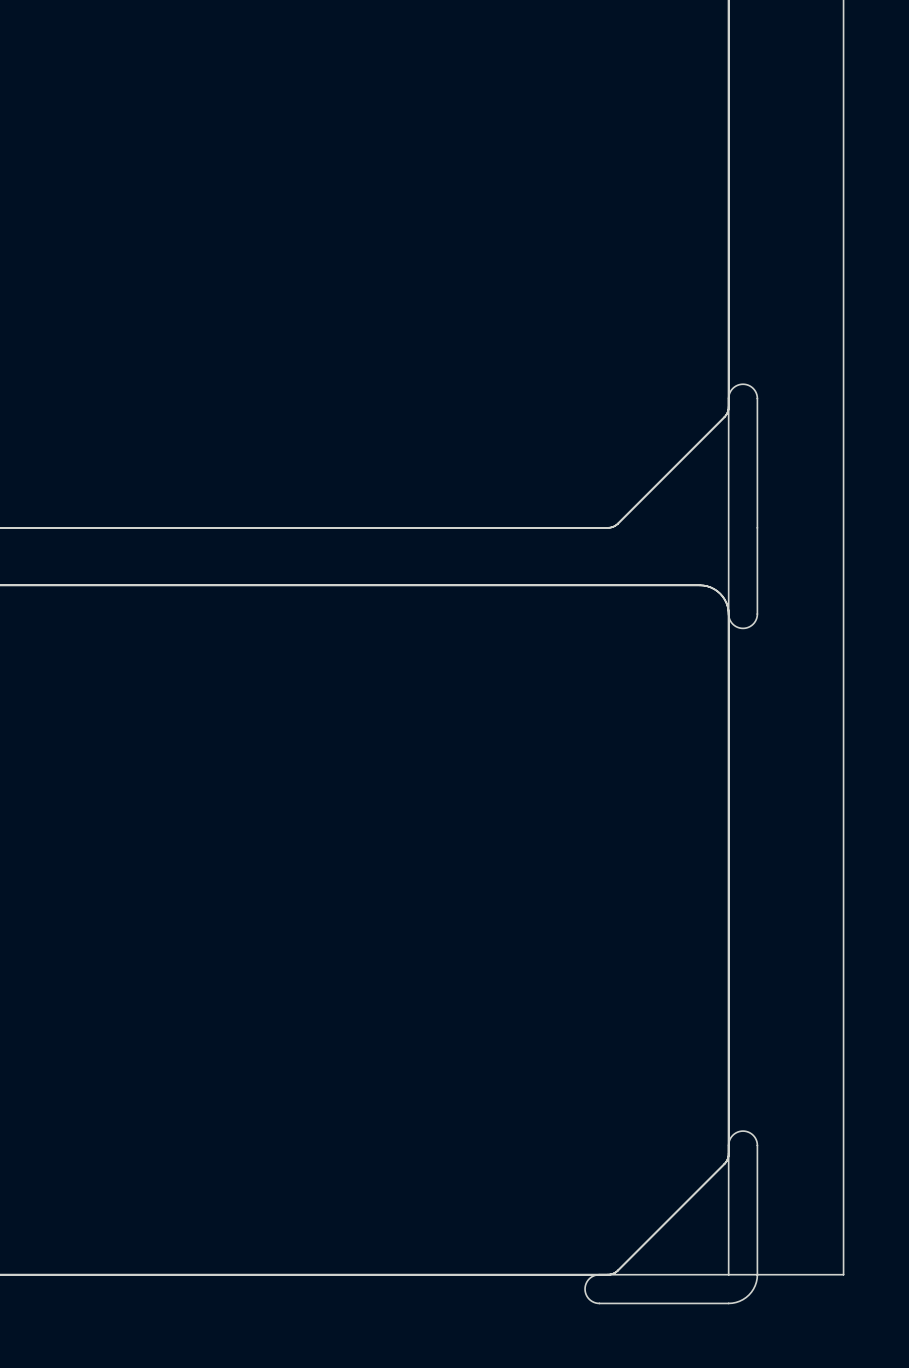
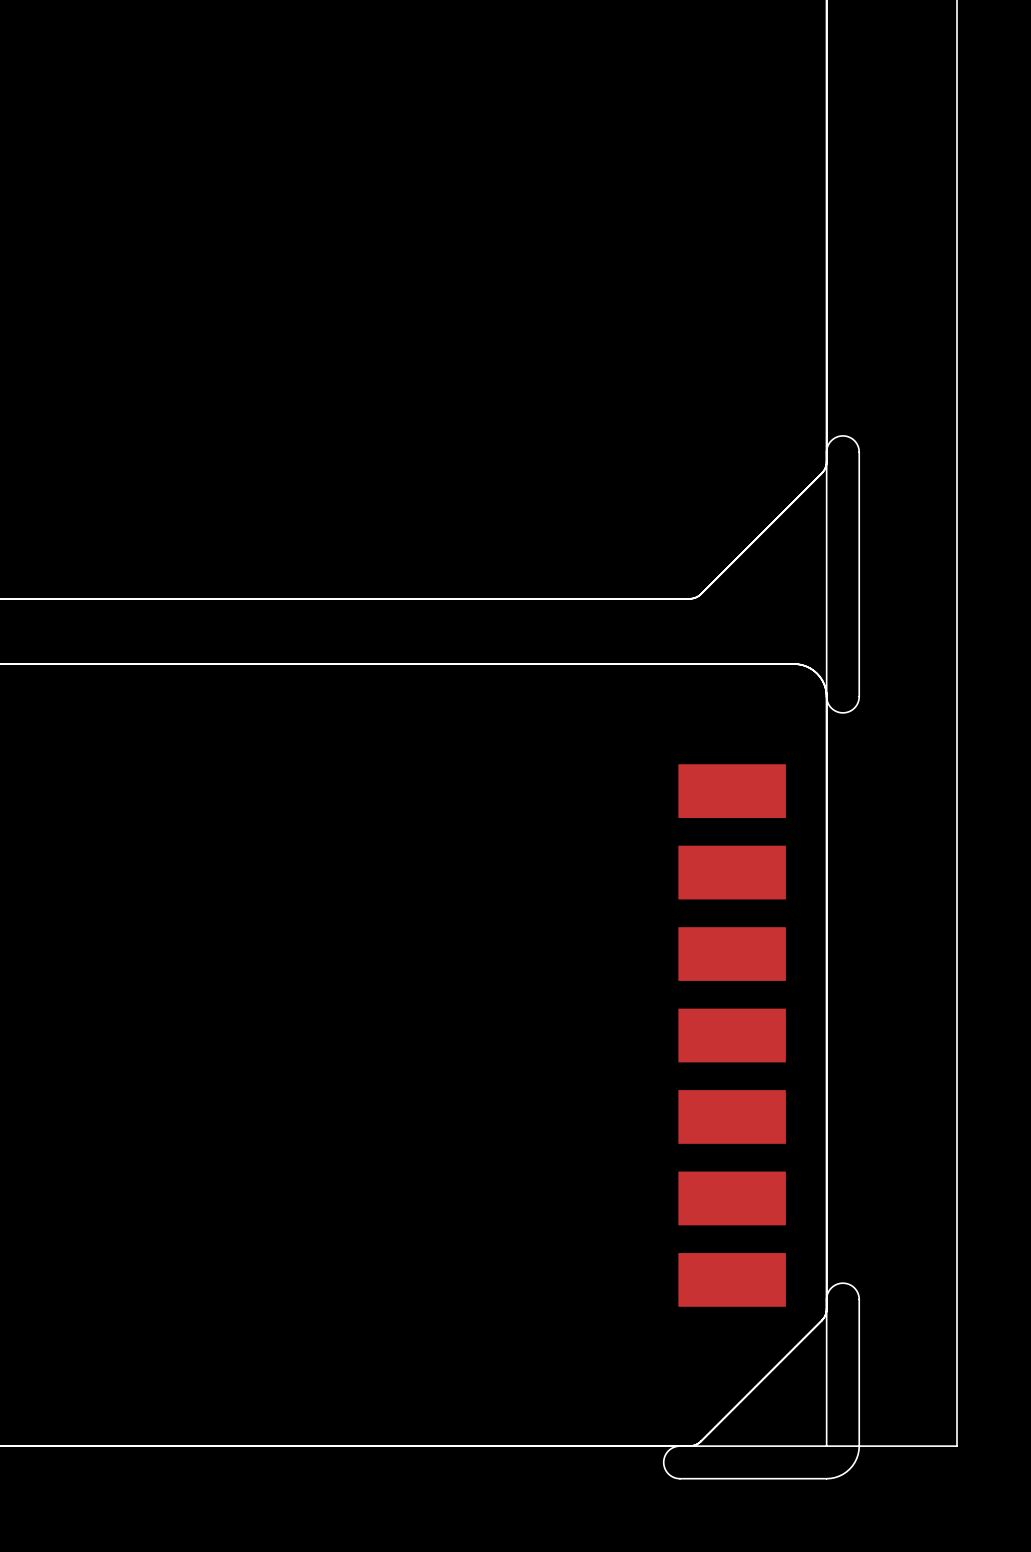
part: none -> (732, 1035)

